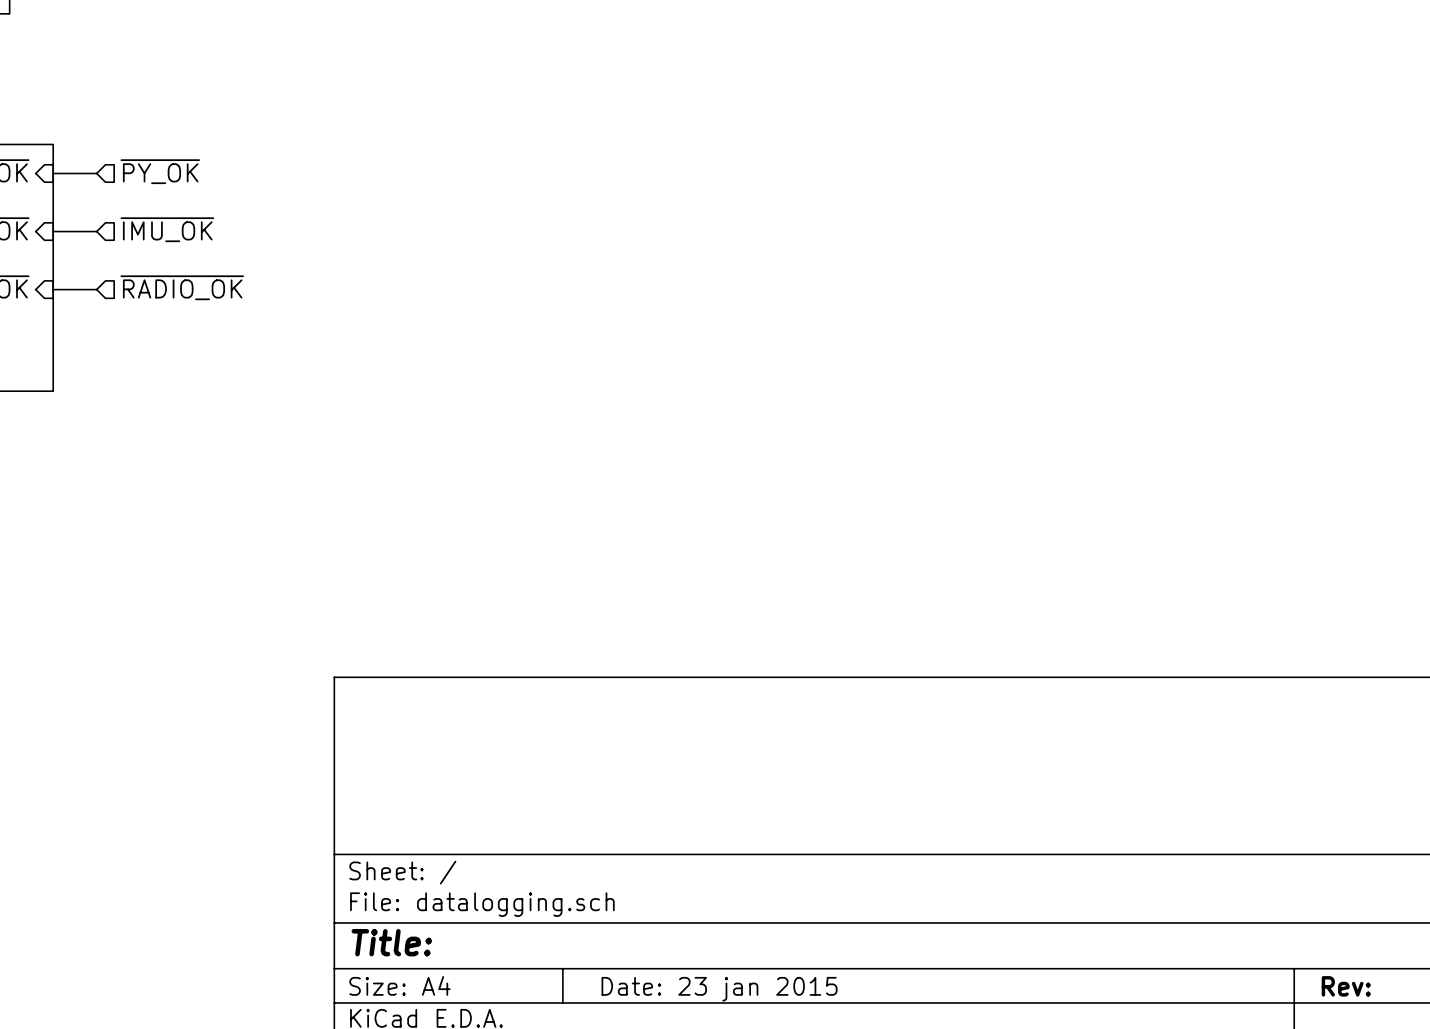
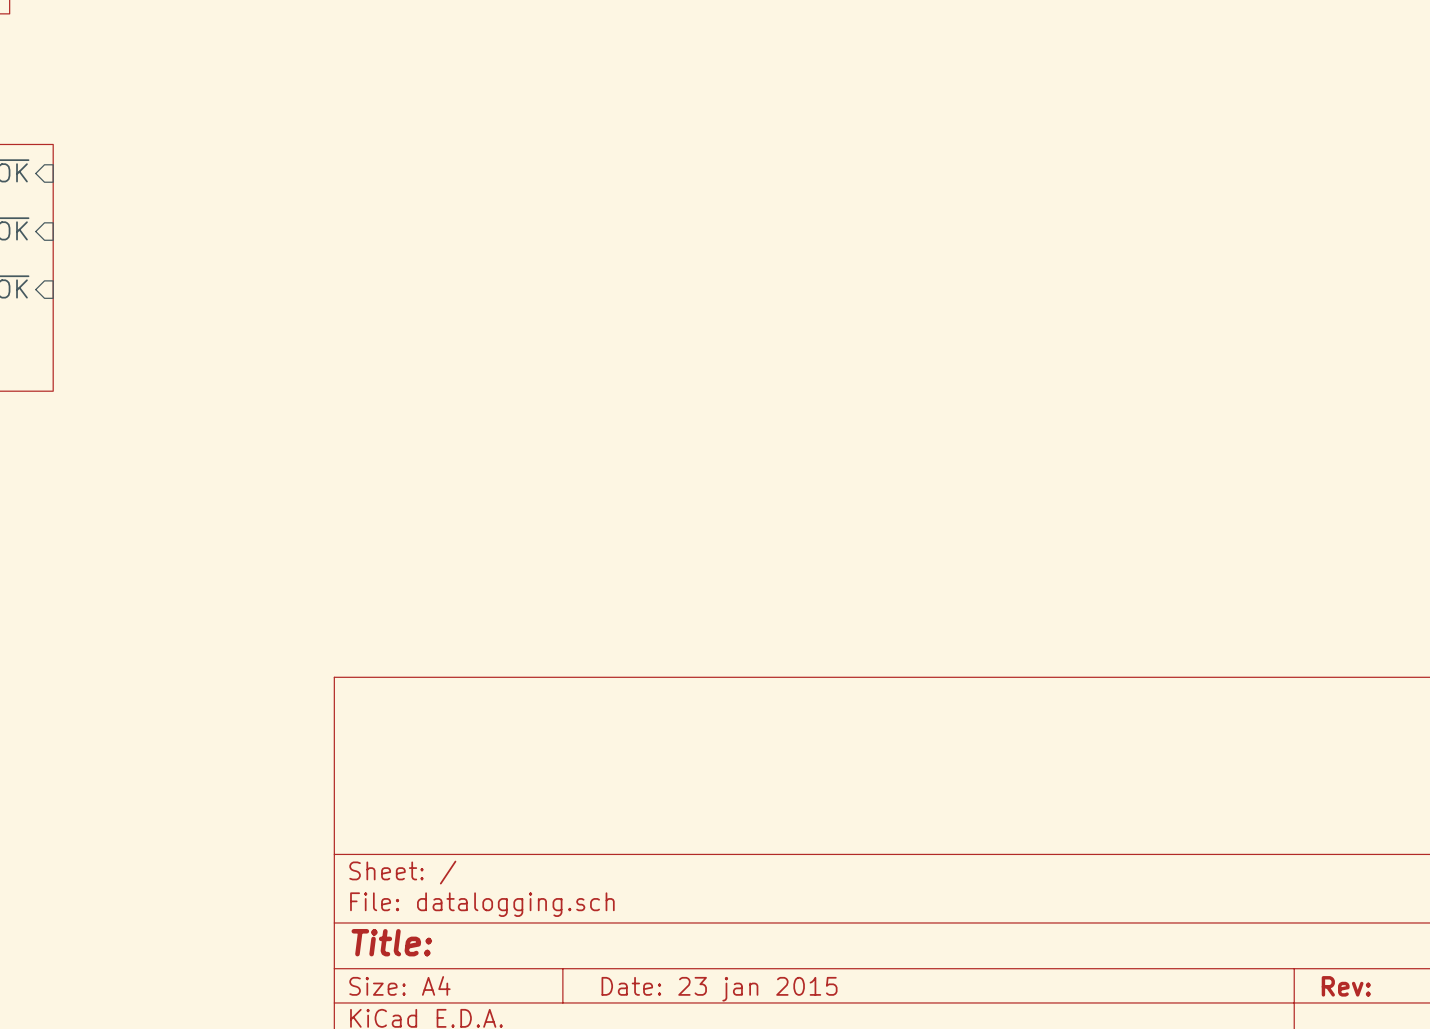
hierarchical label: ~{PY_OK} (160, 171) -> none
wire: (53, 173) (96, 173) -> none
hierarchical label: ~{IMU_OK} (167, 229) -> none
wire: (53, 231) (96, 231) -> none
hierarchical label: ~{RADIO_OK} (182, 287) -> none
wire: (53, 289) (96, 289) -> none

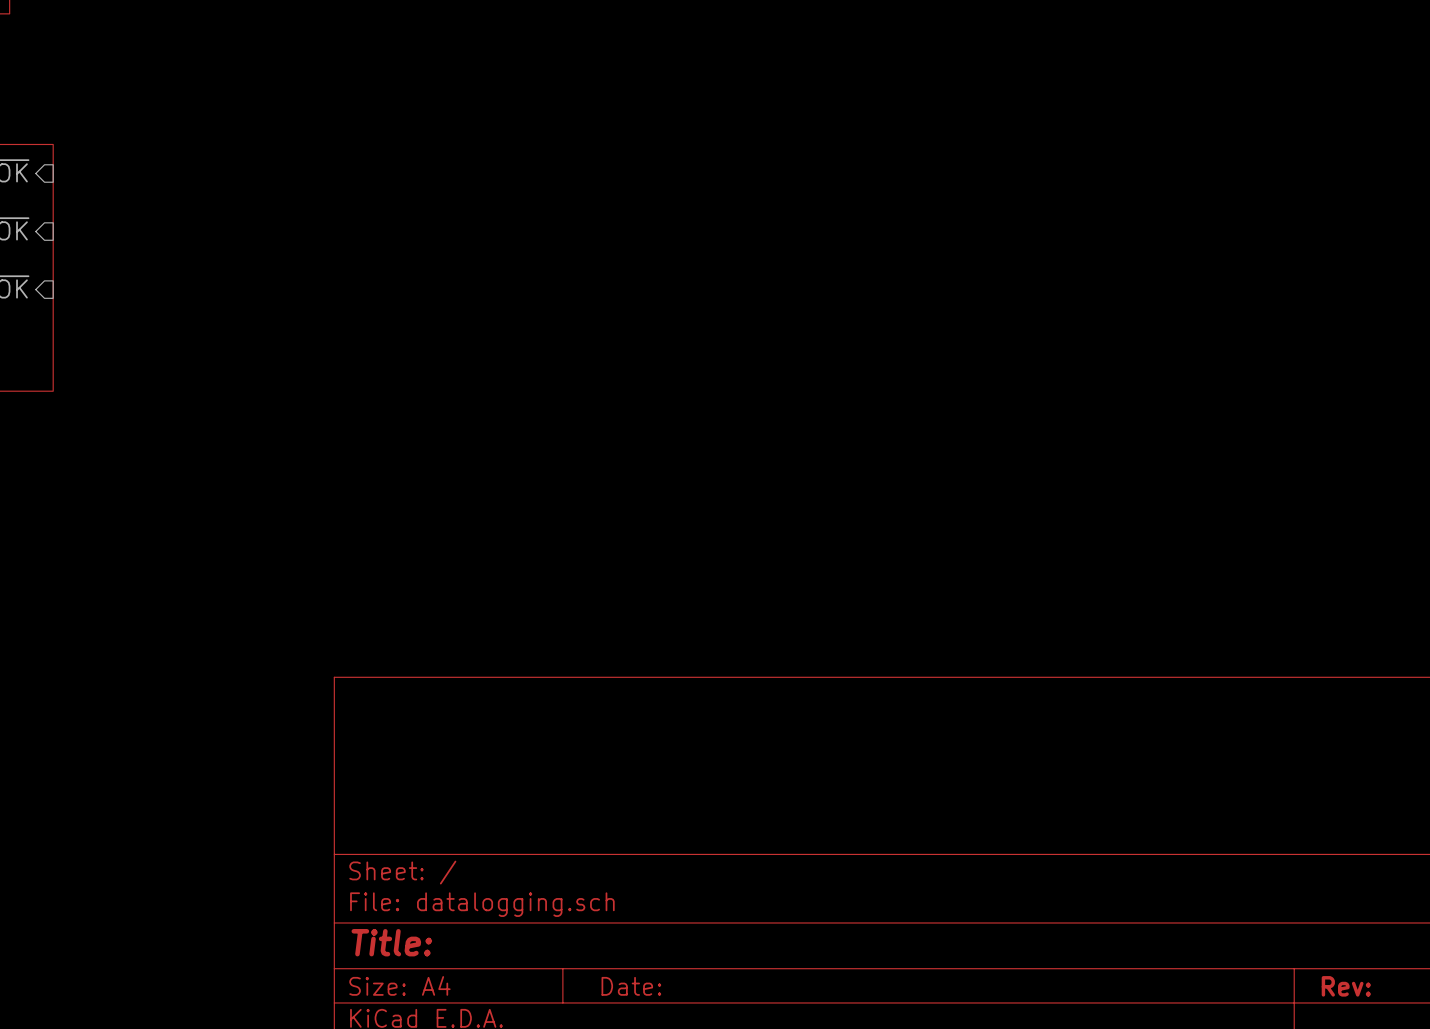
title block: Date: 23 jan 2015 (719, 989) -> Date: (631, 986)

